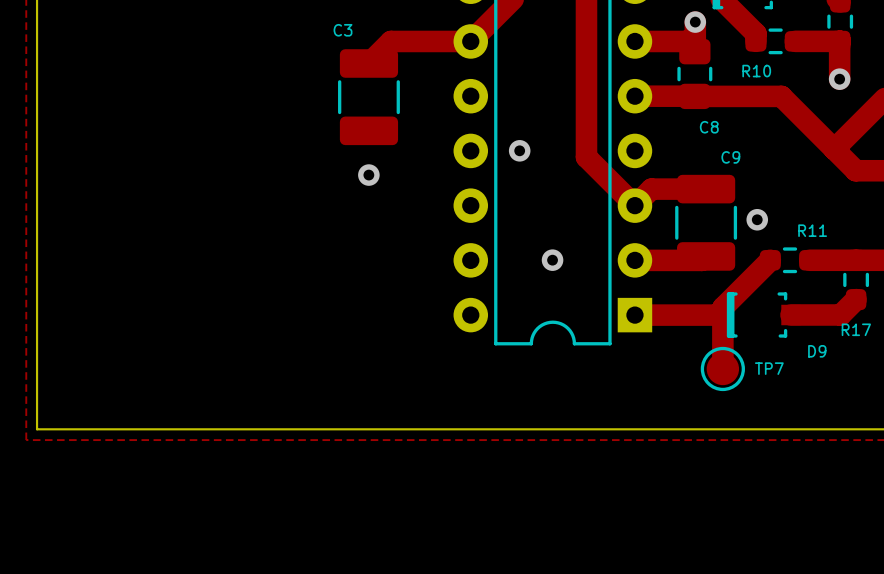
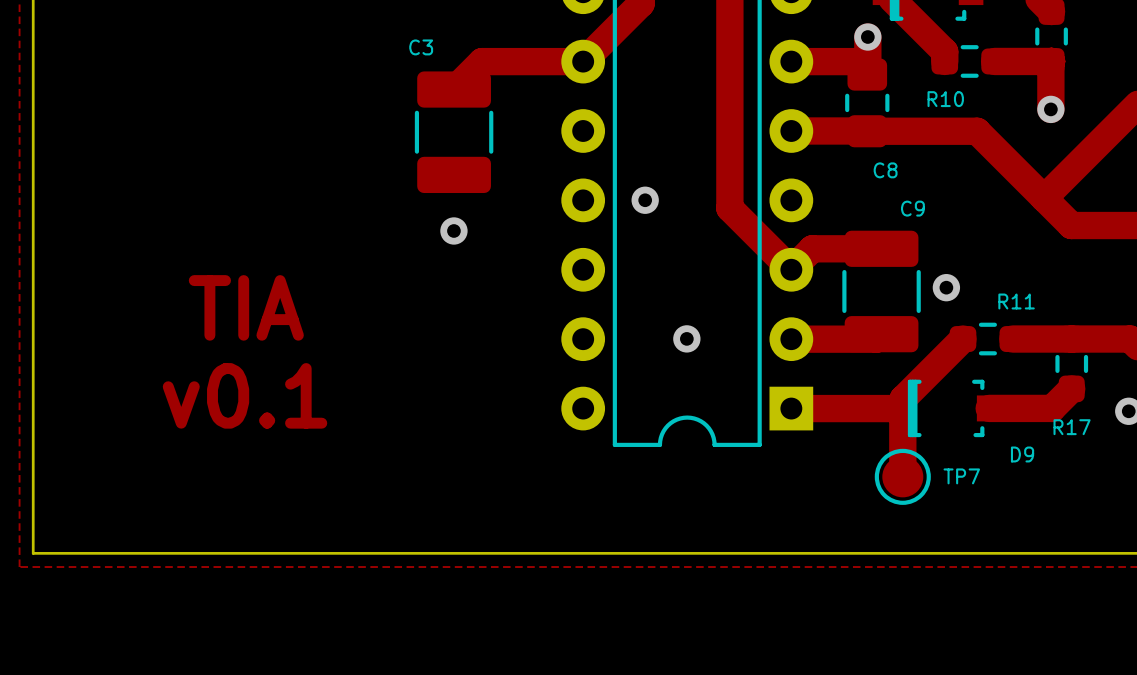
text: none -> TIA (246, 307)
text: none -> v0.1 (245, 395)

